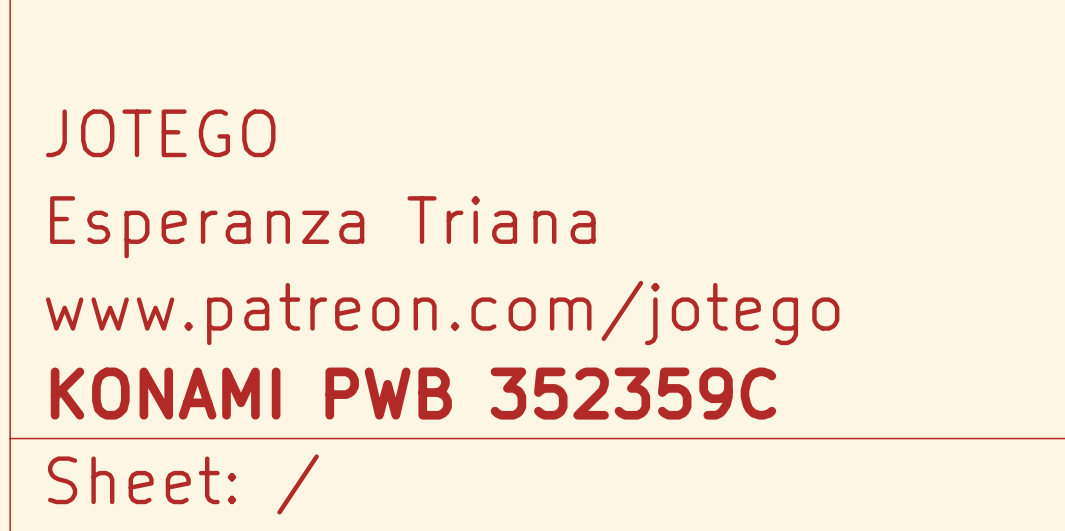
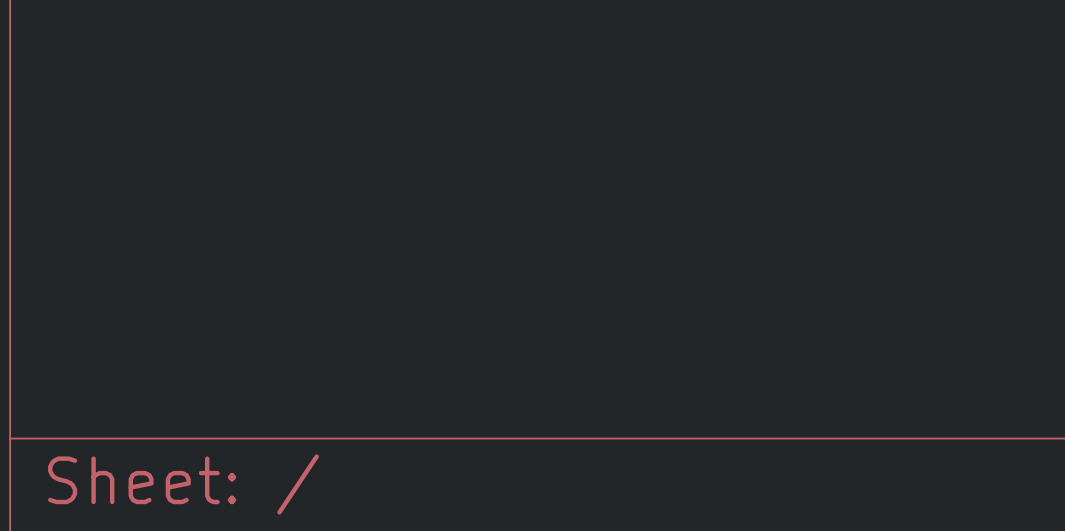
title block: JOTEGO (160, 133) -> none
title block: Esperanza Triana (322, 227) -> none
title block: www.patreon.com/jotego (442, 313) -> none
title block: KONAMI PWB 352359C (413, 393) -> none

